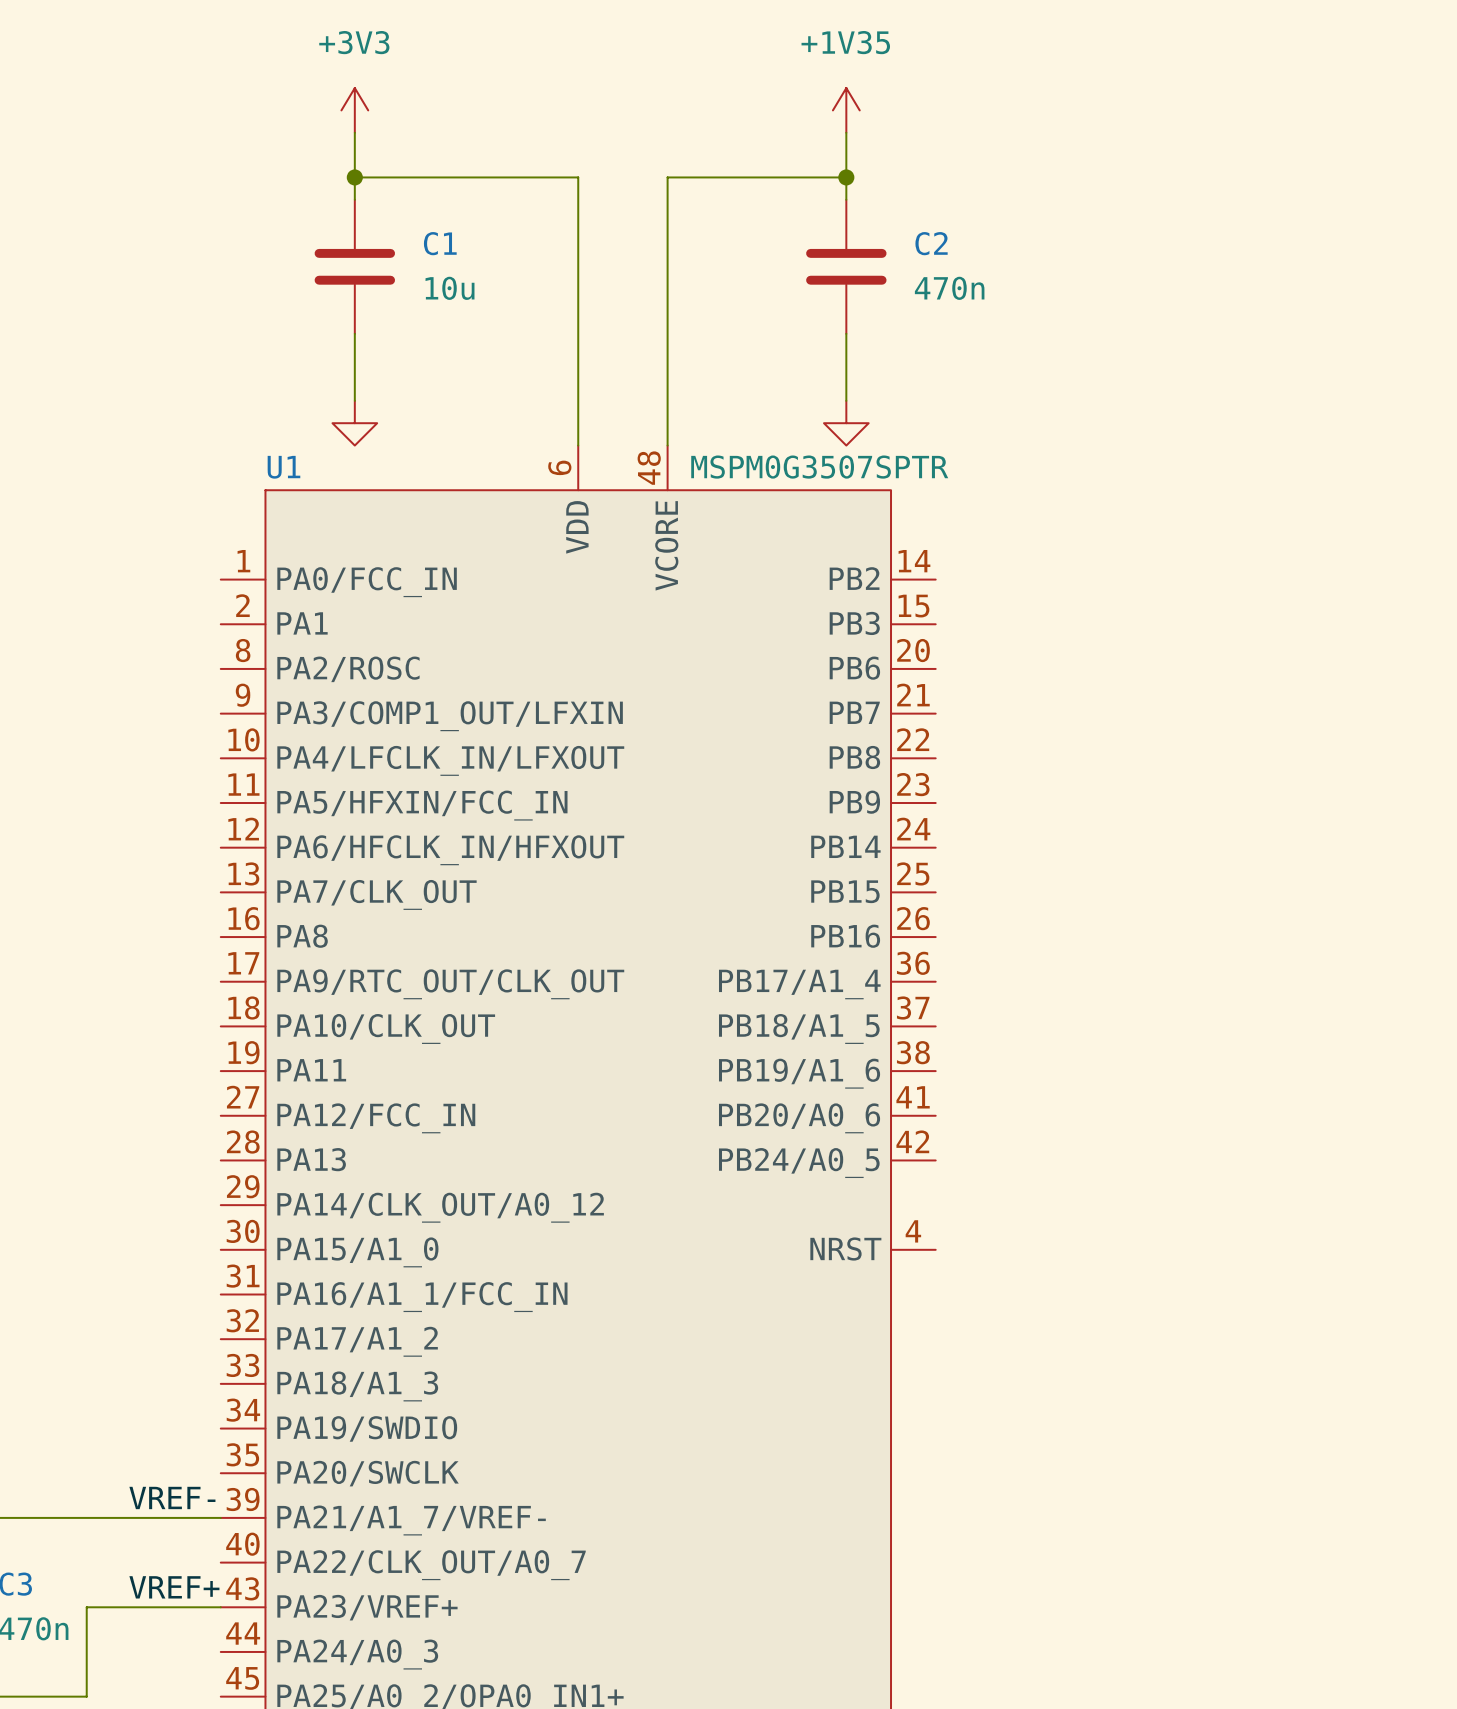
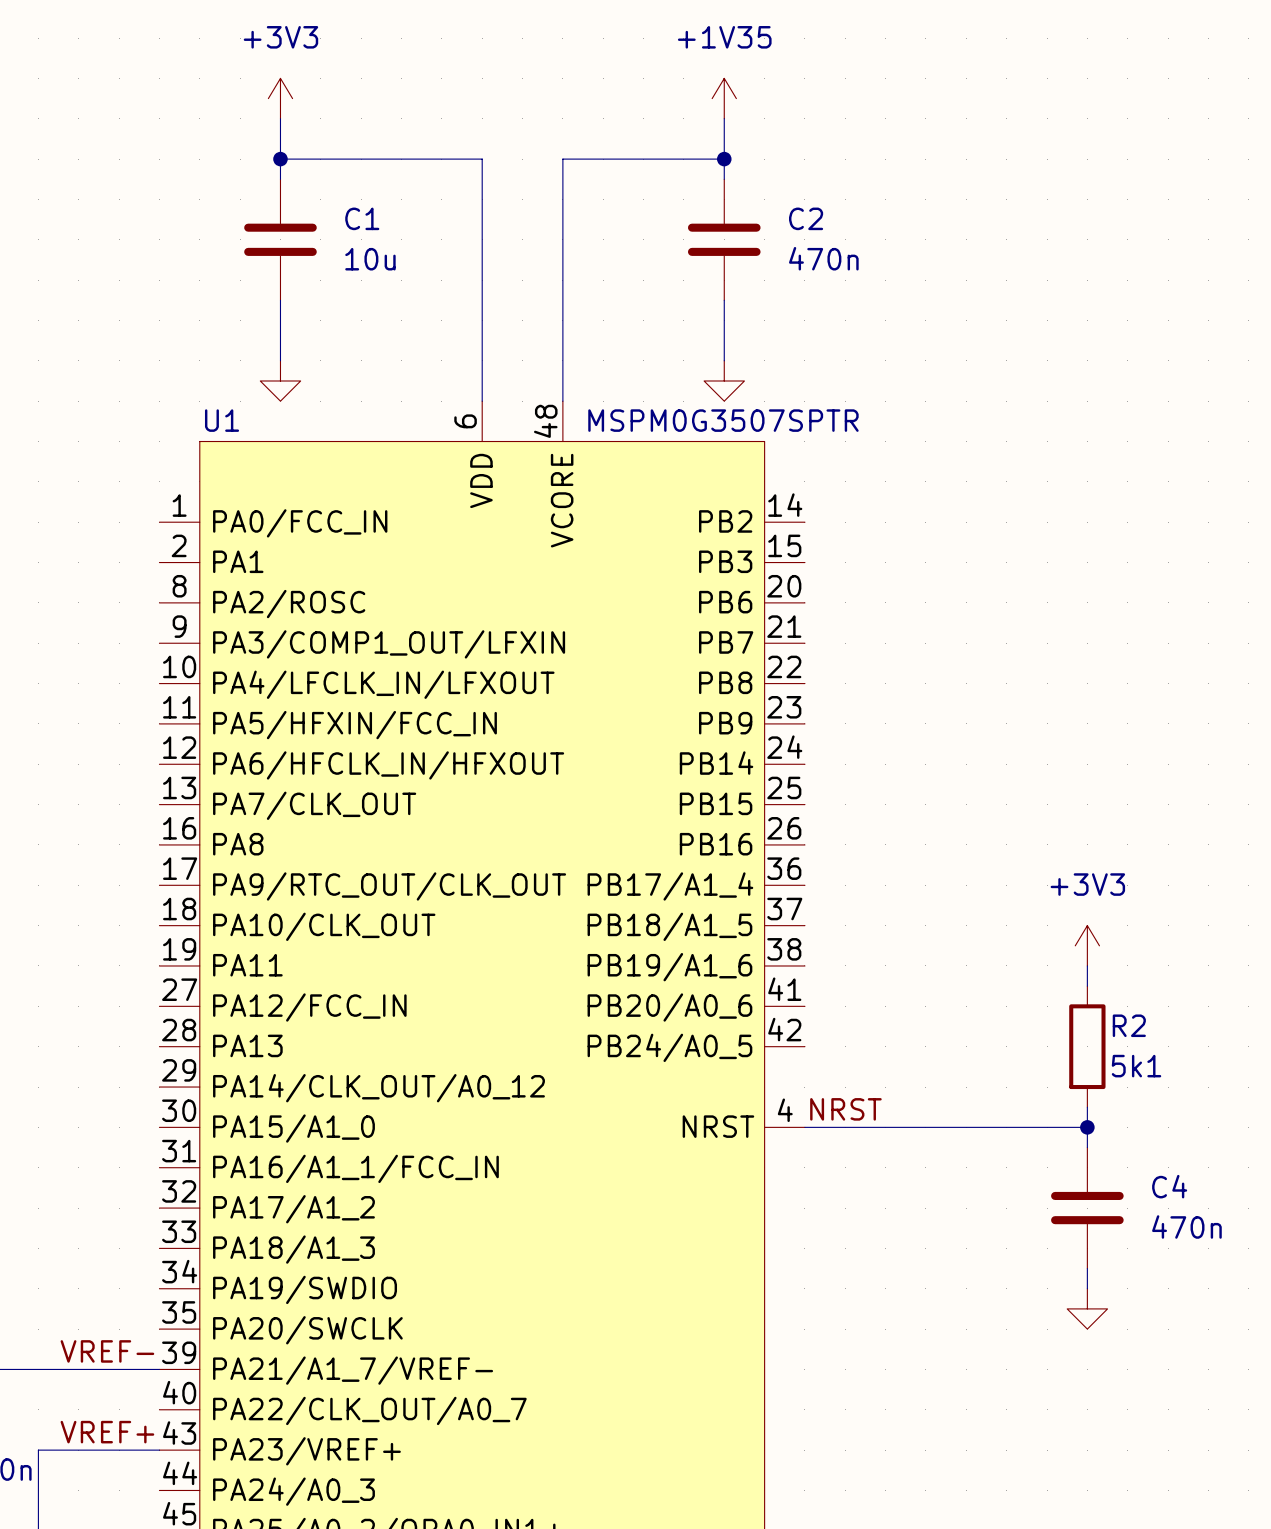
power symbol: none -> +3V3 (1087, 945)
wire: none -> (1087, 965) (1087, 986)
R2: none -> 5k1 (1087, 1046)
wire: none -> (1087, 1107) (1087, 1147)
label: none -> NRST (845, 1109)
wire: none -> (804, 1127) (1087, 1127)
junction: none -> (1087, 1127)
C4: none -> 470n (1087, 1208)
wire: none -> (1087, 1268) (1087, 1288)
power symbol: none -> (1087, 1308)

